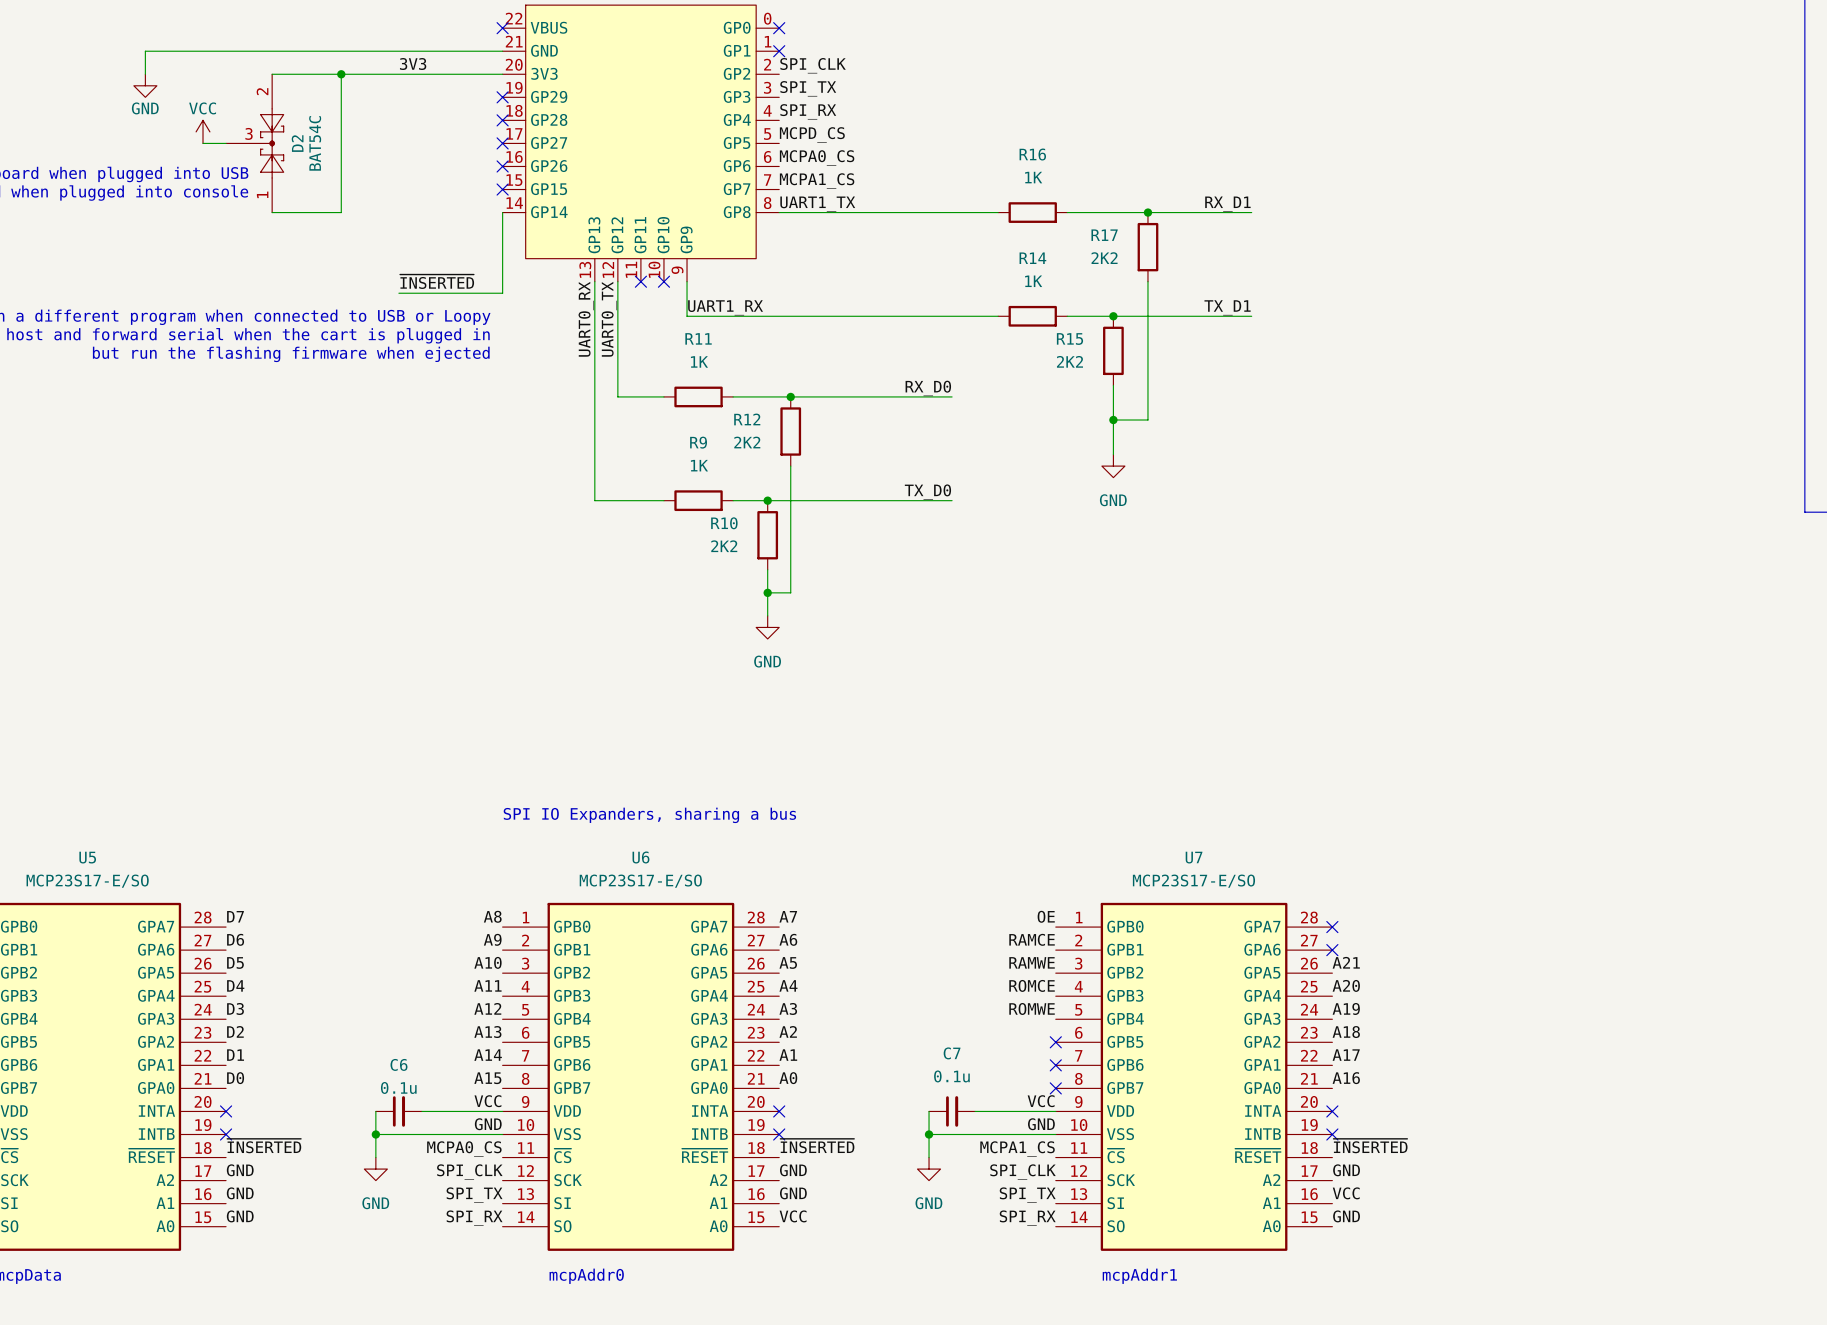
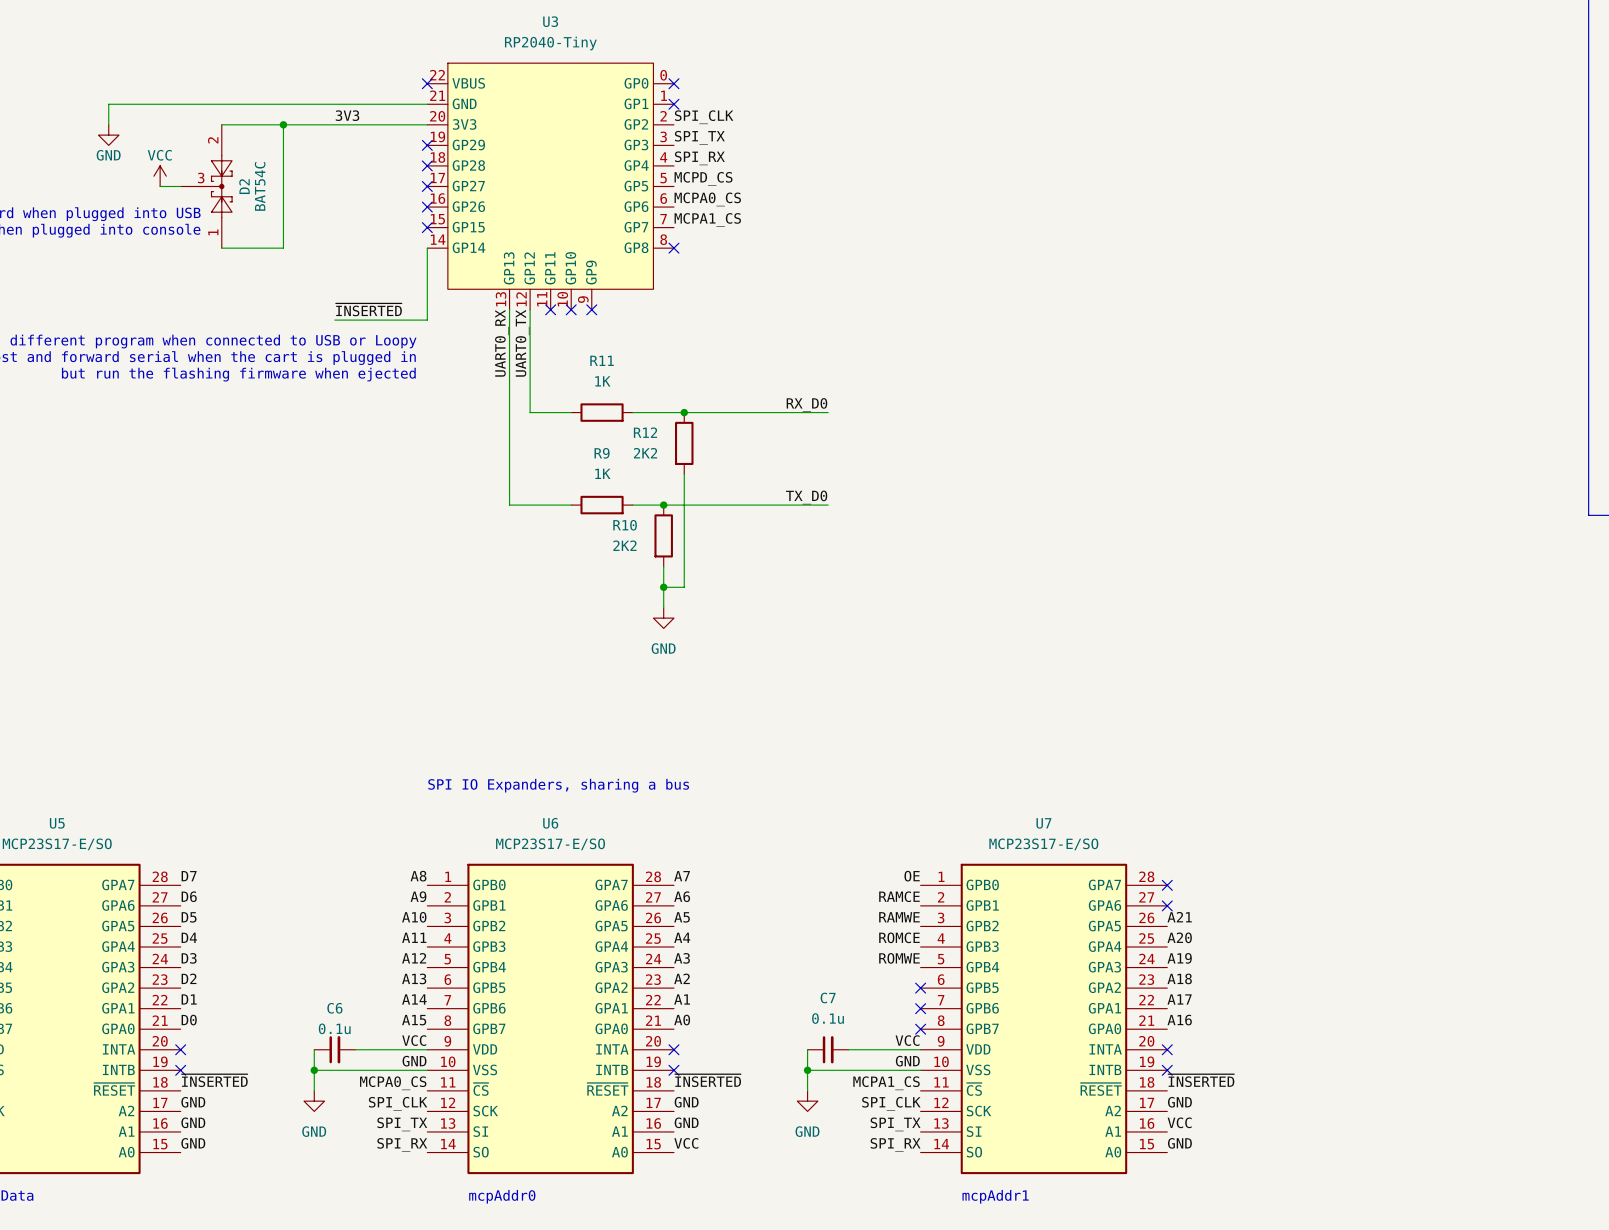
label: UART1_TX (817, 204) -> none
label: RX_D1 (1227, 204) -> none
wire: (779, 212) (998, 212) -> none
no-connect mark: none -> (673, 248)
R16: 1K (1032, 212) -> none
wire: (1067, 212) (1251, 212) -> none
junction: (1147, 212) -> none
R17: 2K2 (1147, 247) -> none
wire: (687, 281) (687, 316) (998, 316) -> none
no-connect mark: none -> (591, 309)
wire: (1147, 281) (1147, 420) (1113, 420) -> none
label: UART1_RX (725, 307) -> none
label: TX_D1 (1227, 307) -> none
R14: 1K (1032, 316) -> none
wire: (1067, 316) (1251, 316) -> none
junction: (1113, 316) -> none
R15: 2K2 (1113, 350) -> none
wire: (1113, 385) (1113, 454) -> none
junction: (1113, 420) -> none
power symbol: GND (1113, 466) -> none

